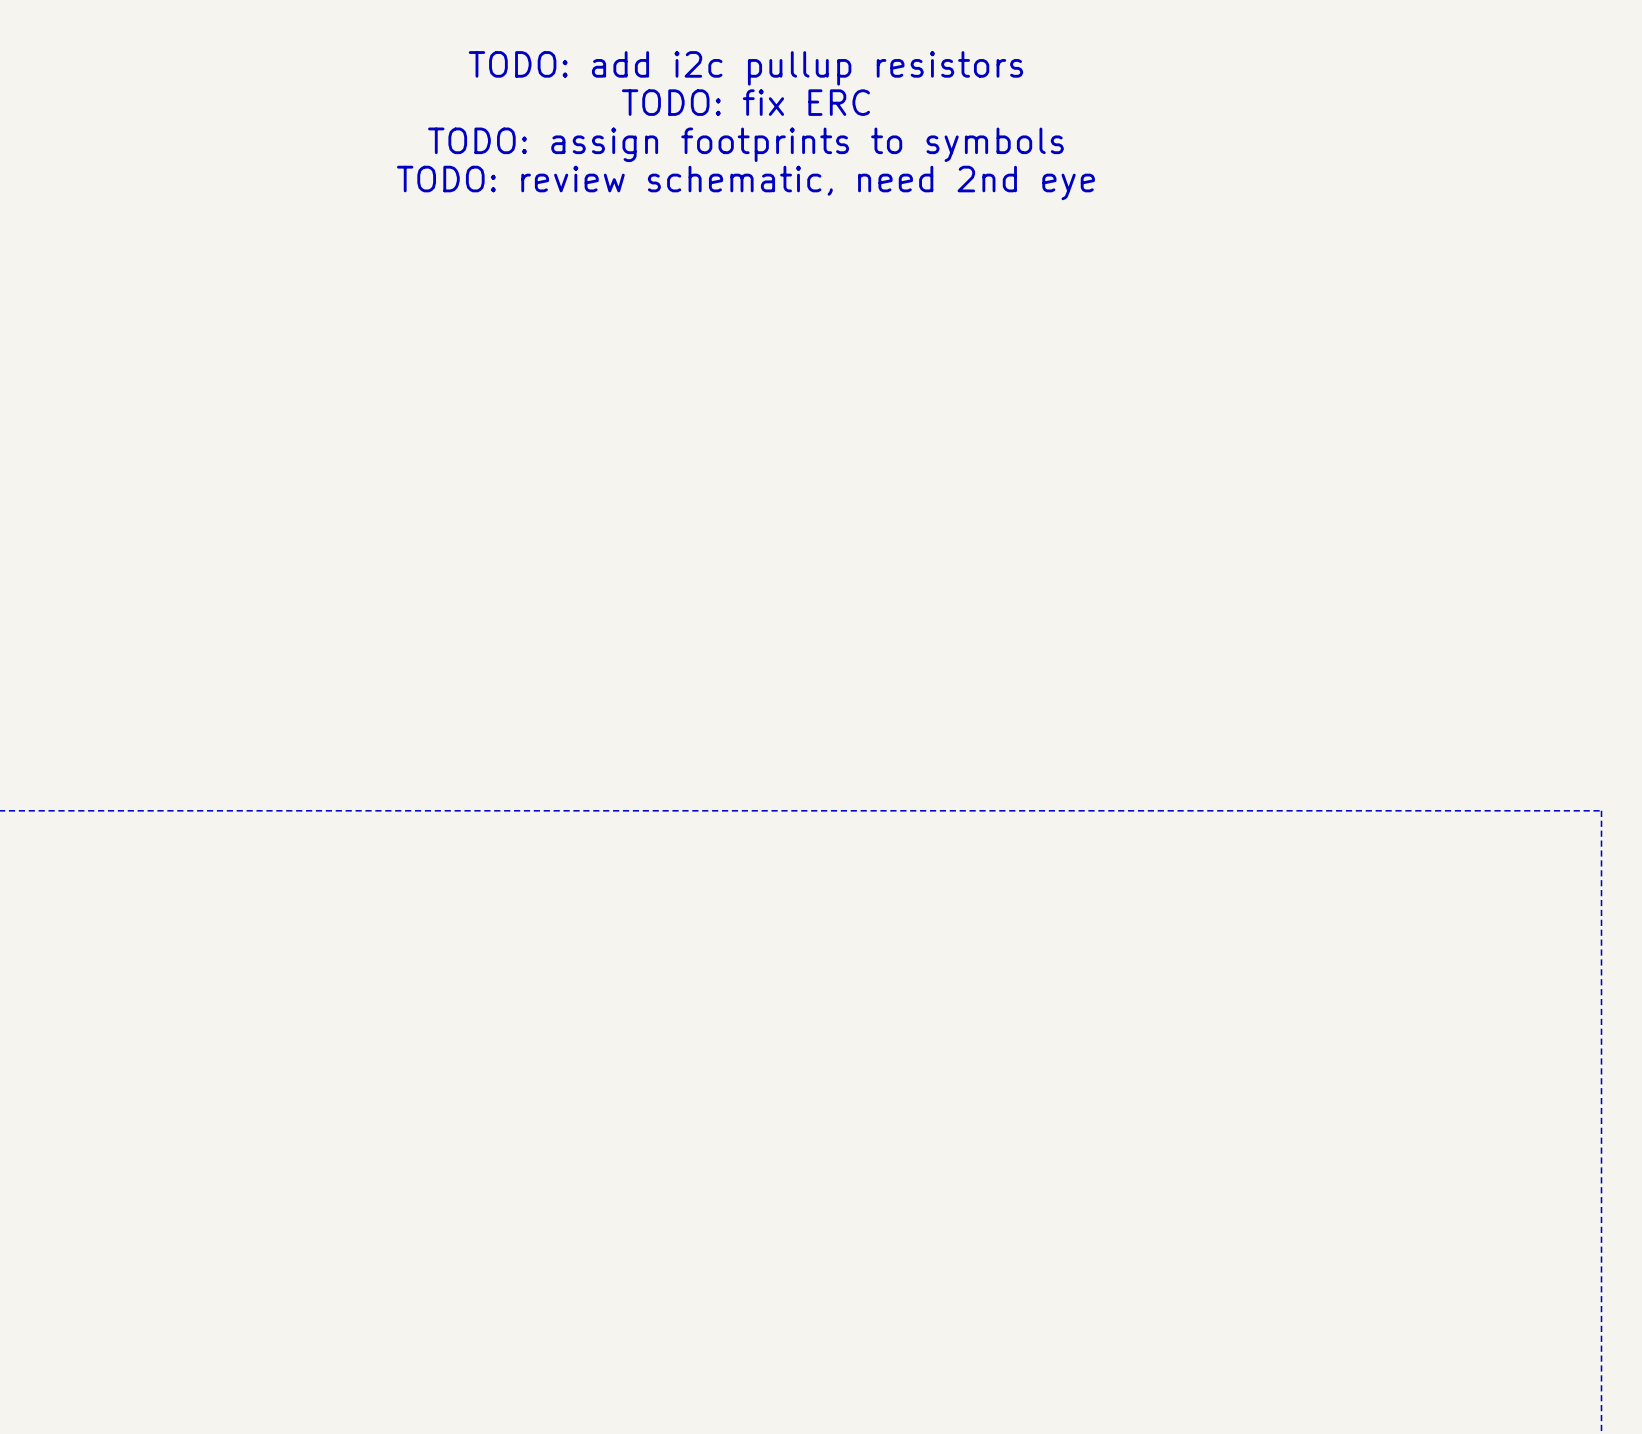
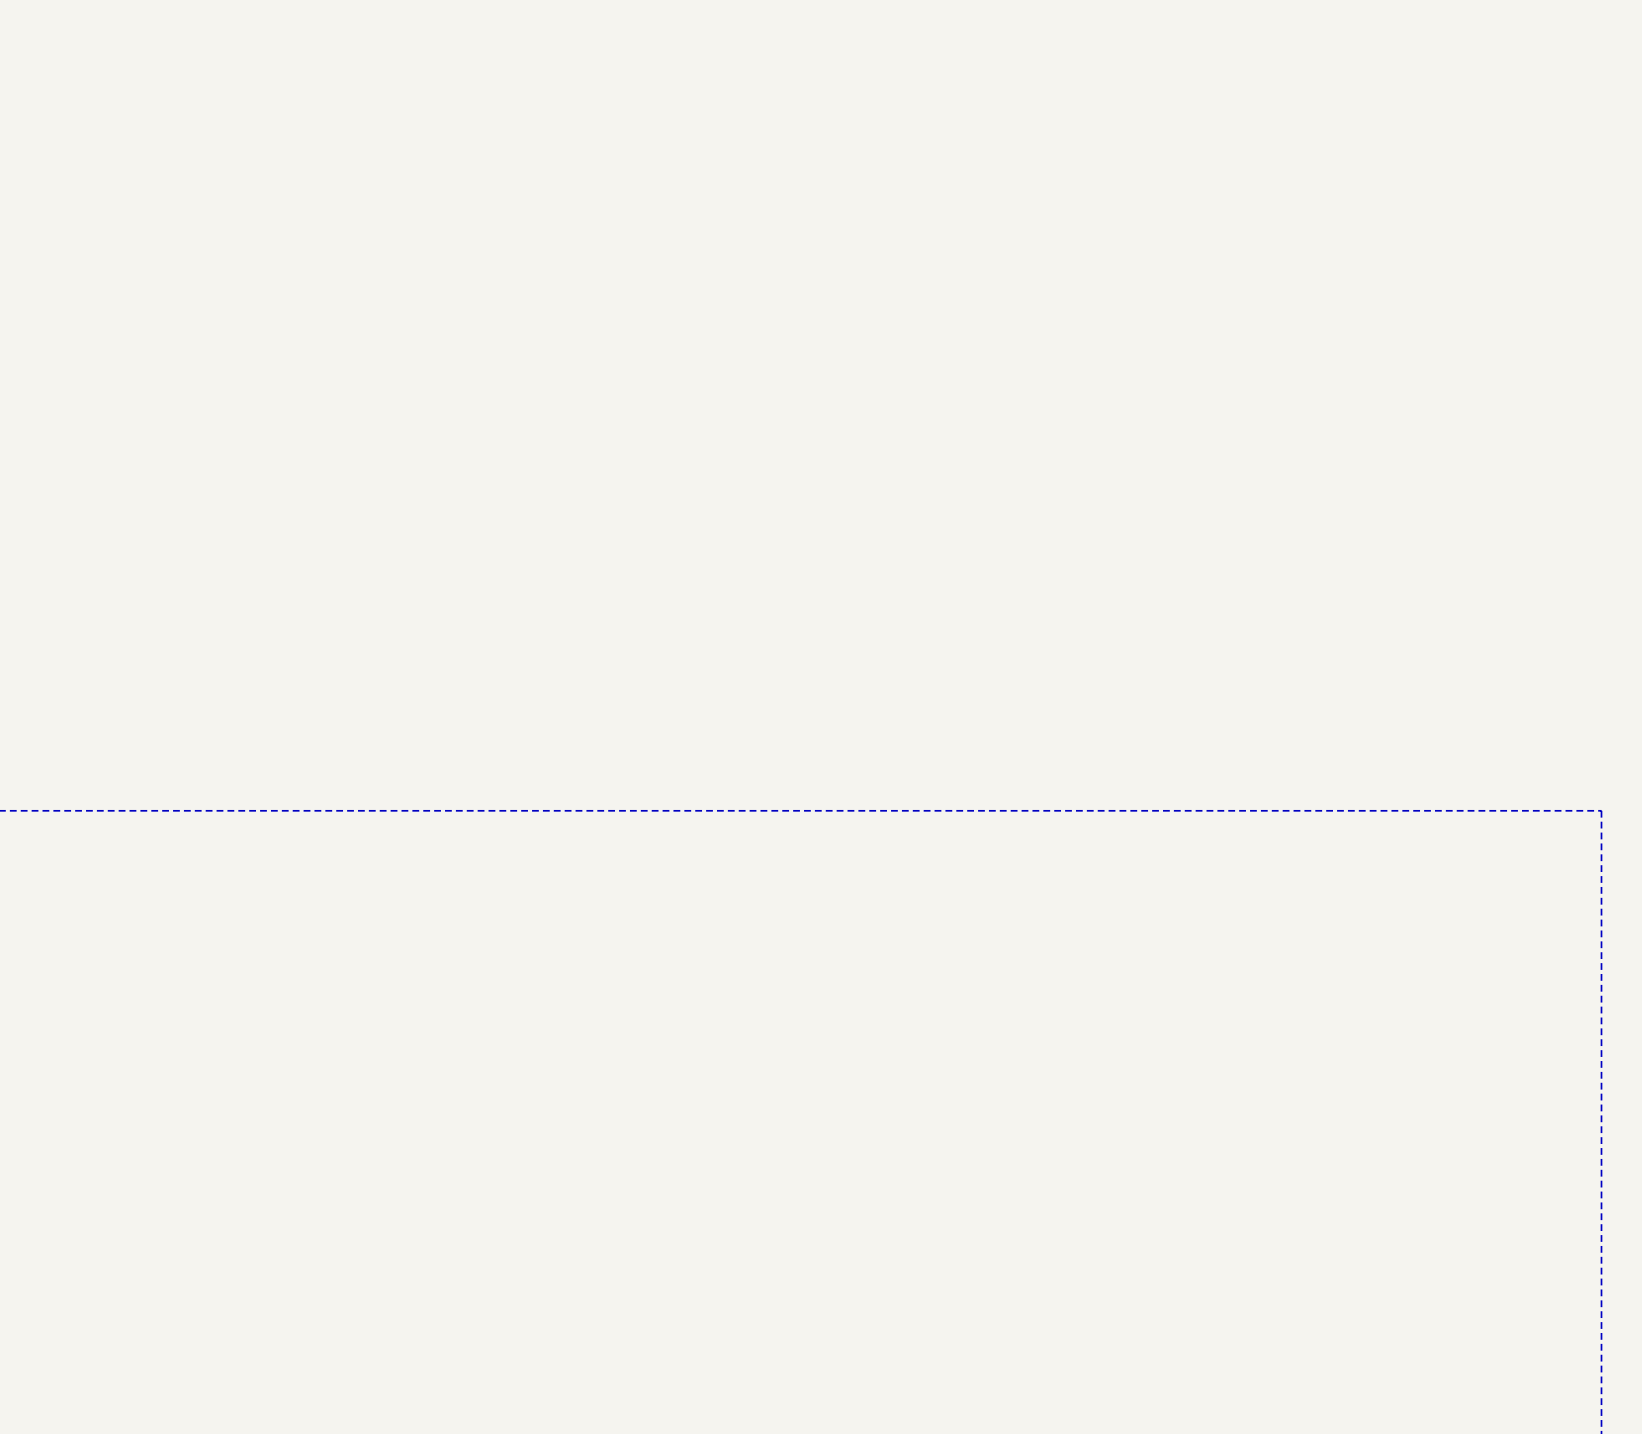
text: TODO: add i2c pullup resistors (745, 68) -> none
text: TODO: fix ERC (745, 102) -> none
text: TODO: assign footprints to symbols (745, 144) -> none
text: TODO: review schematic, need 2nd eye (745, 182) -> none

